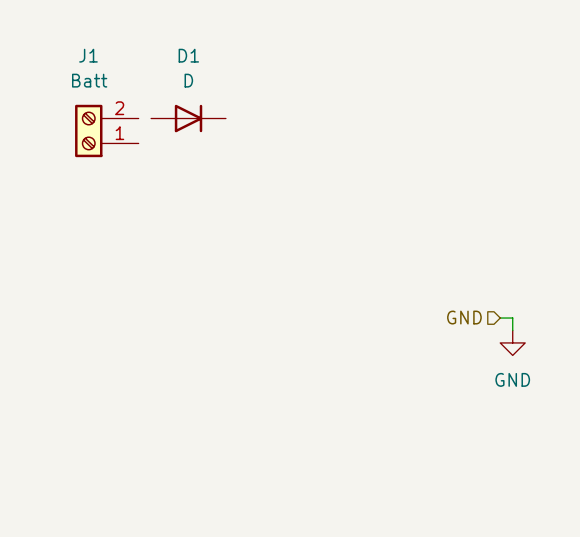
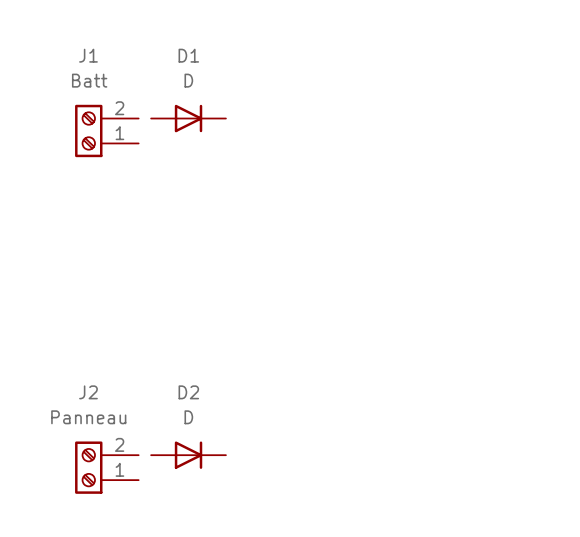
hierarchical label: GND (464, 317) -> none
wire: (500, 318) (512, 318) (512, 330) -> none
power symbol: GND (512, 342) -> none
D2: none -> D (188, 455)
J2: none -> Panneau (106, 467)

